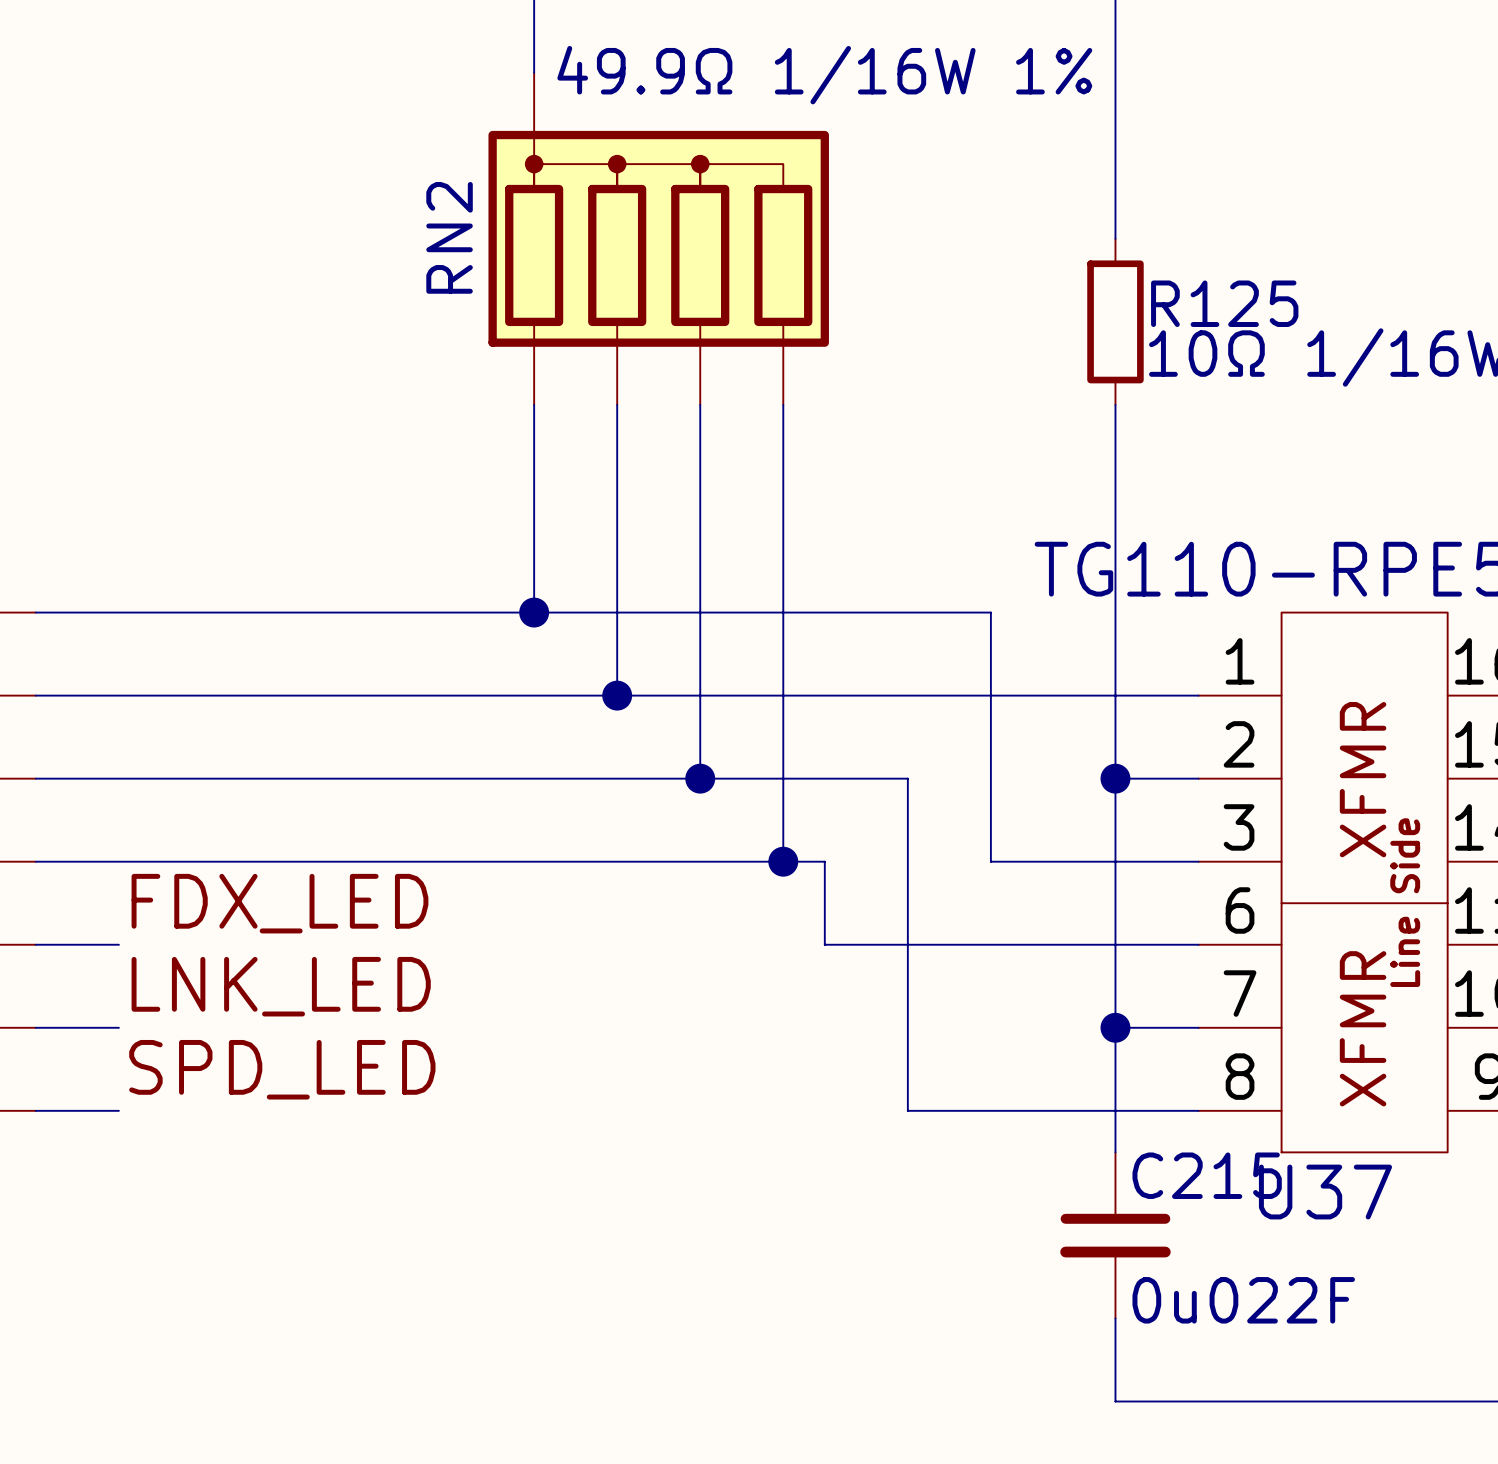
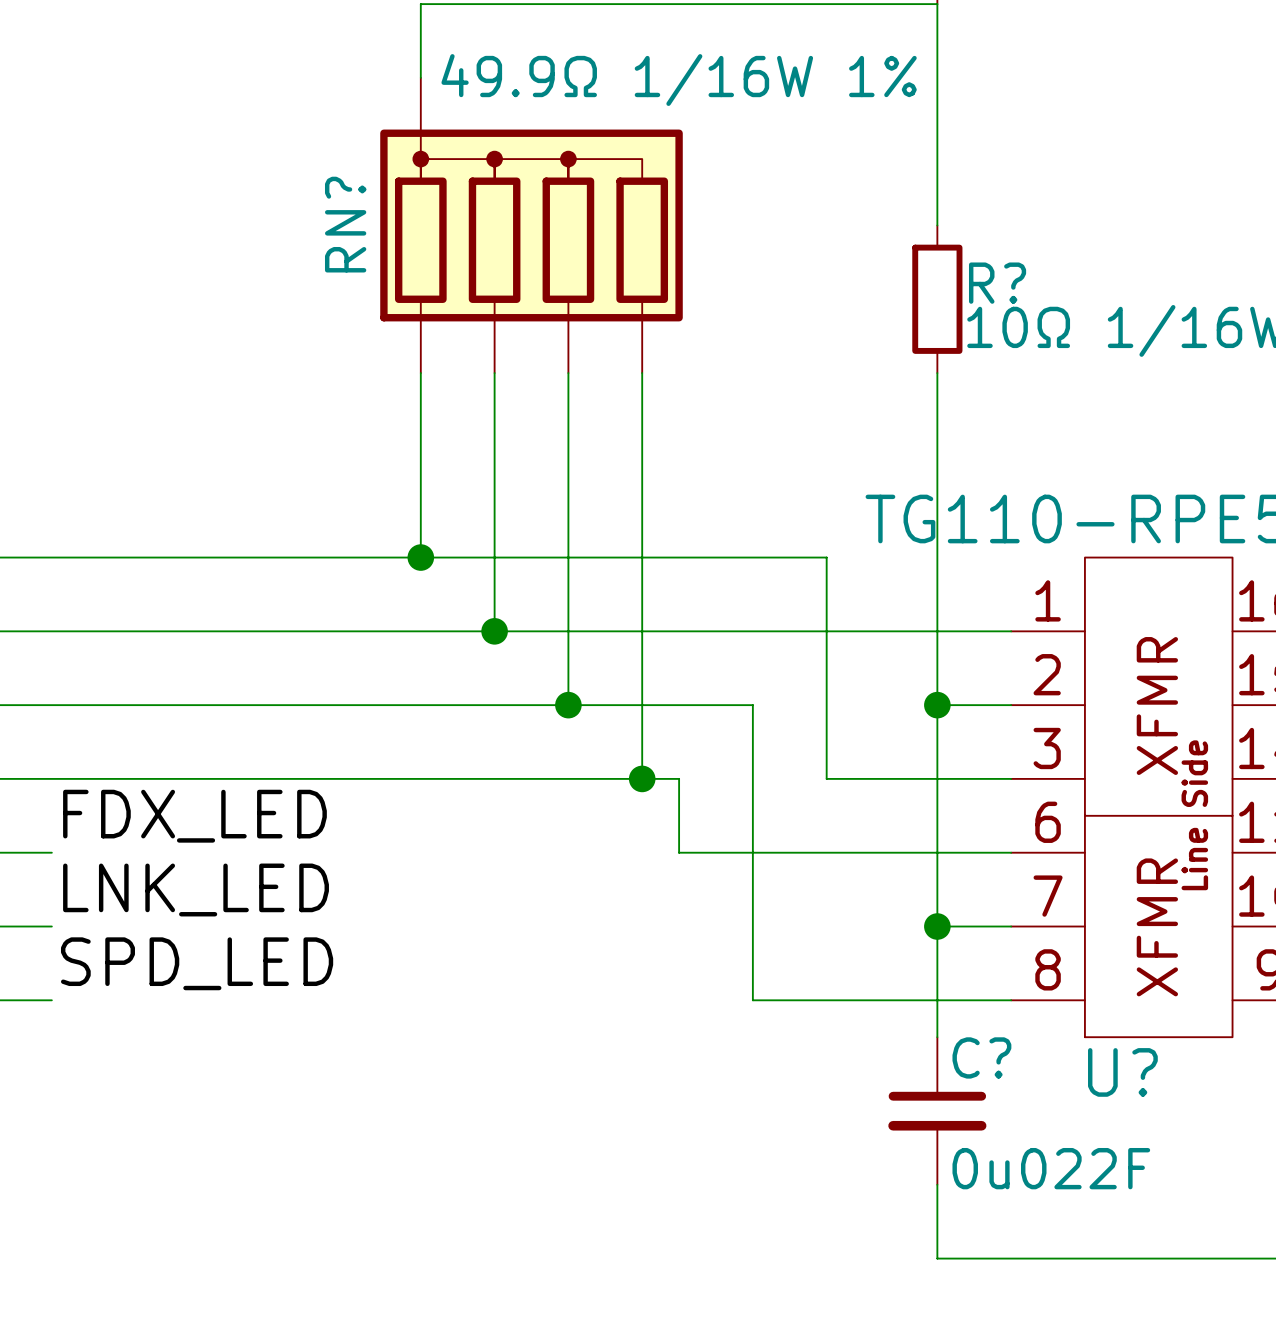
RN2 name: RN2 (449, 237) -> RN? (345, 224)
R125 name: R125 (1224, 303) -> R? (997, 283)
C215 name: C215 (1207, 1175) -> C? (981, 1057)
U37 name: U37 (1325, 1192) -> U? (1122, 1072)

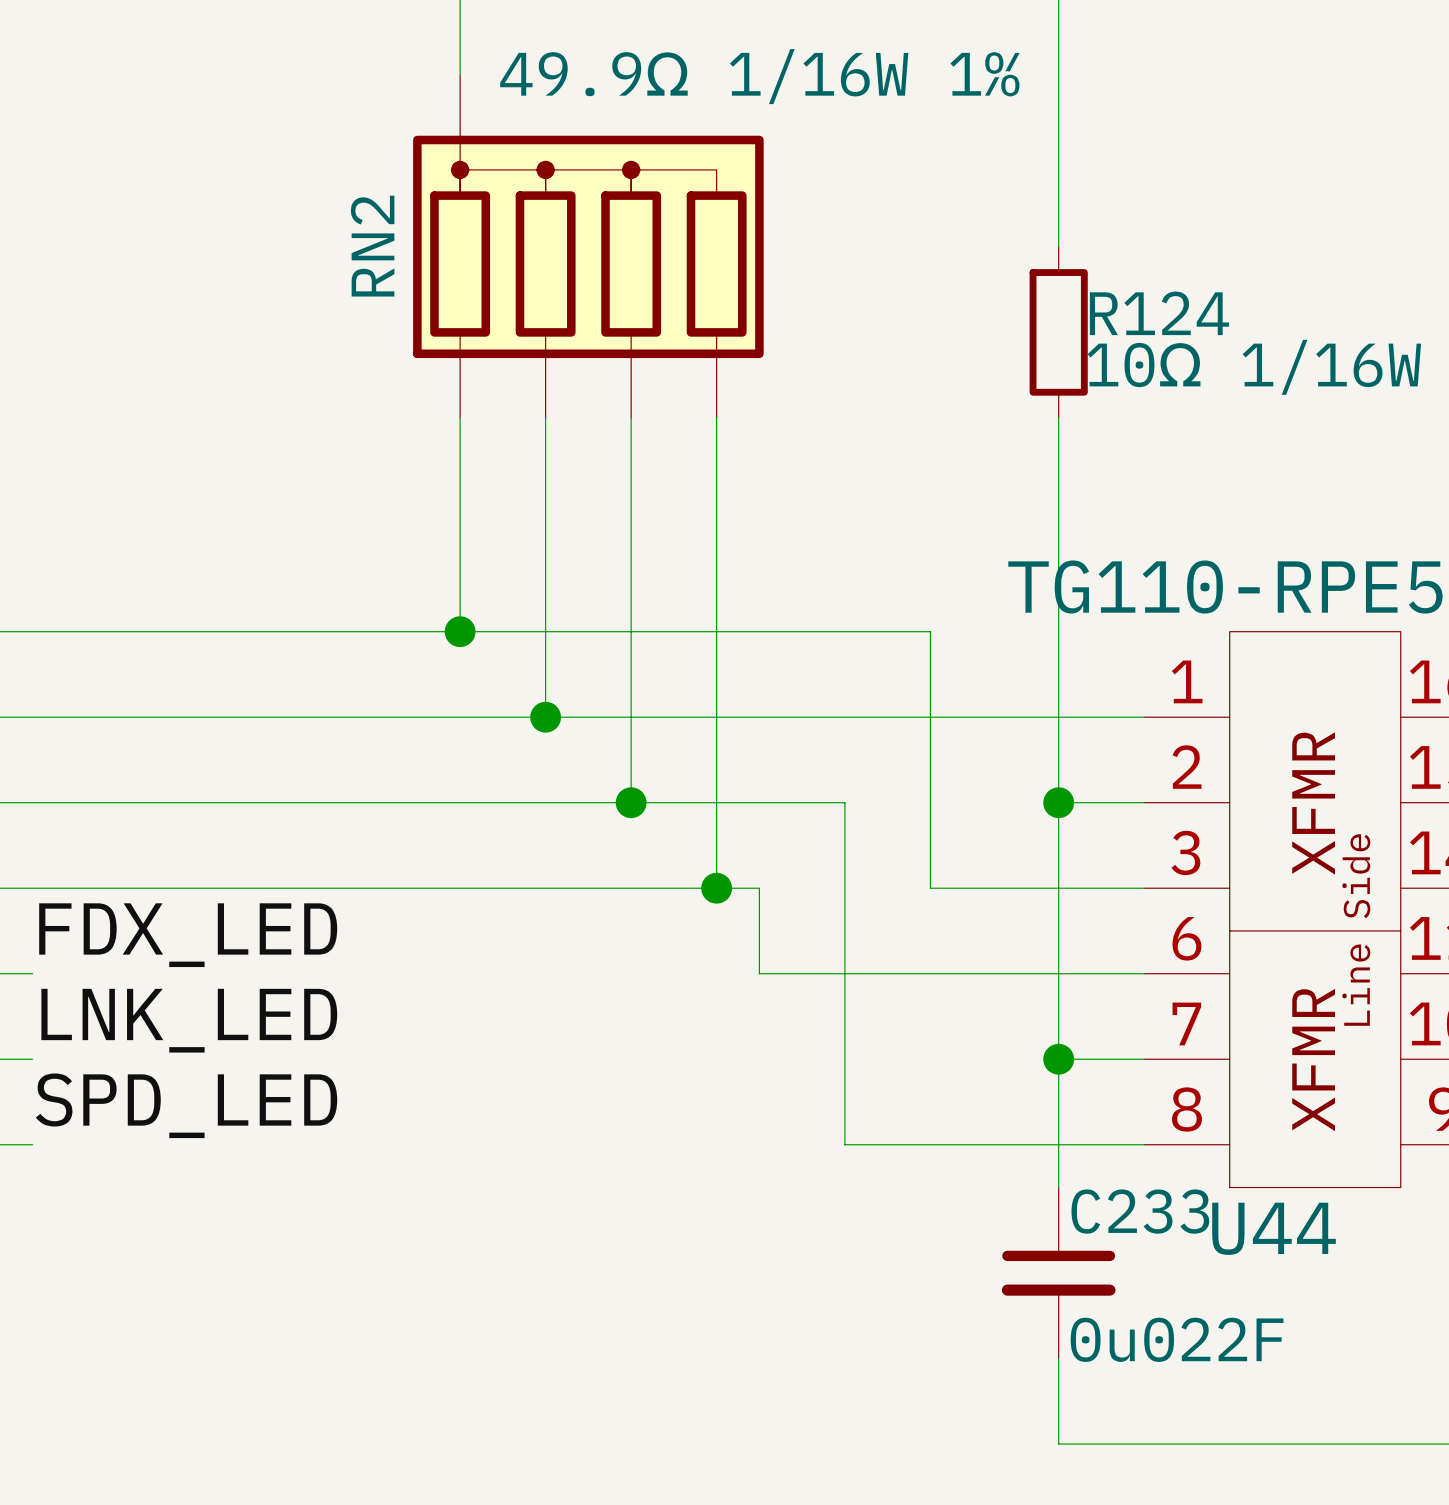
RN? name: RN? (345, 224) -> RN2 (372, 246)
R? name: R? (997, 283) -> R124 (1159, 313)
C? name: C? (981, 1057) -> C233 (1140, 1211)
U? name: U? (1122, 1072) -> U44 (1274, 1228)

